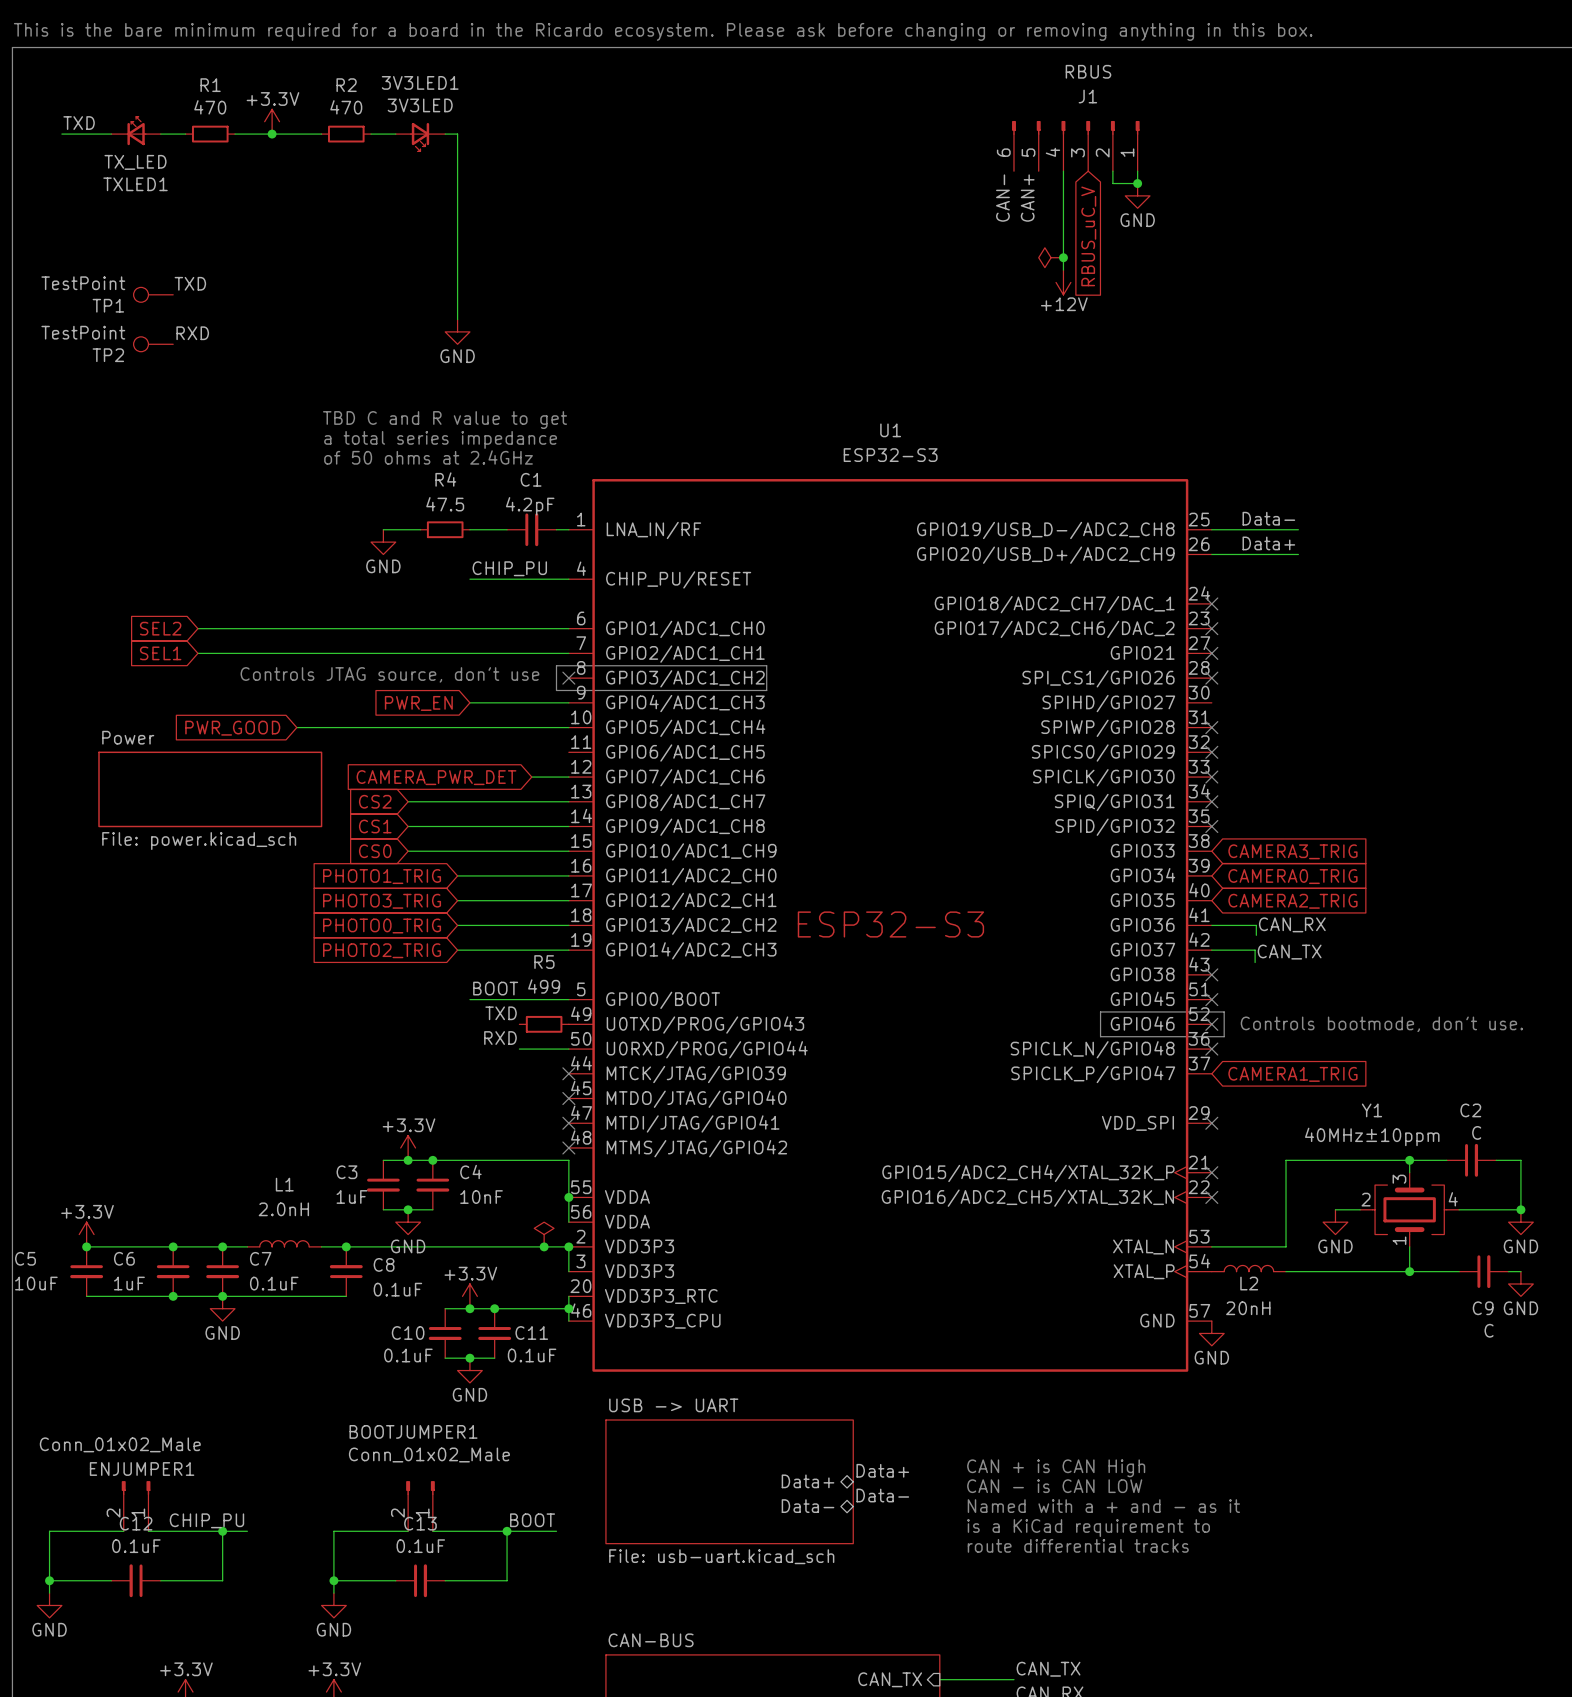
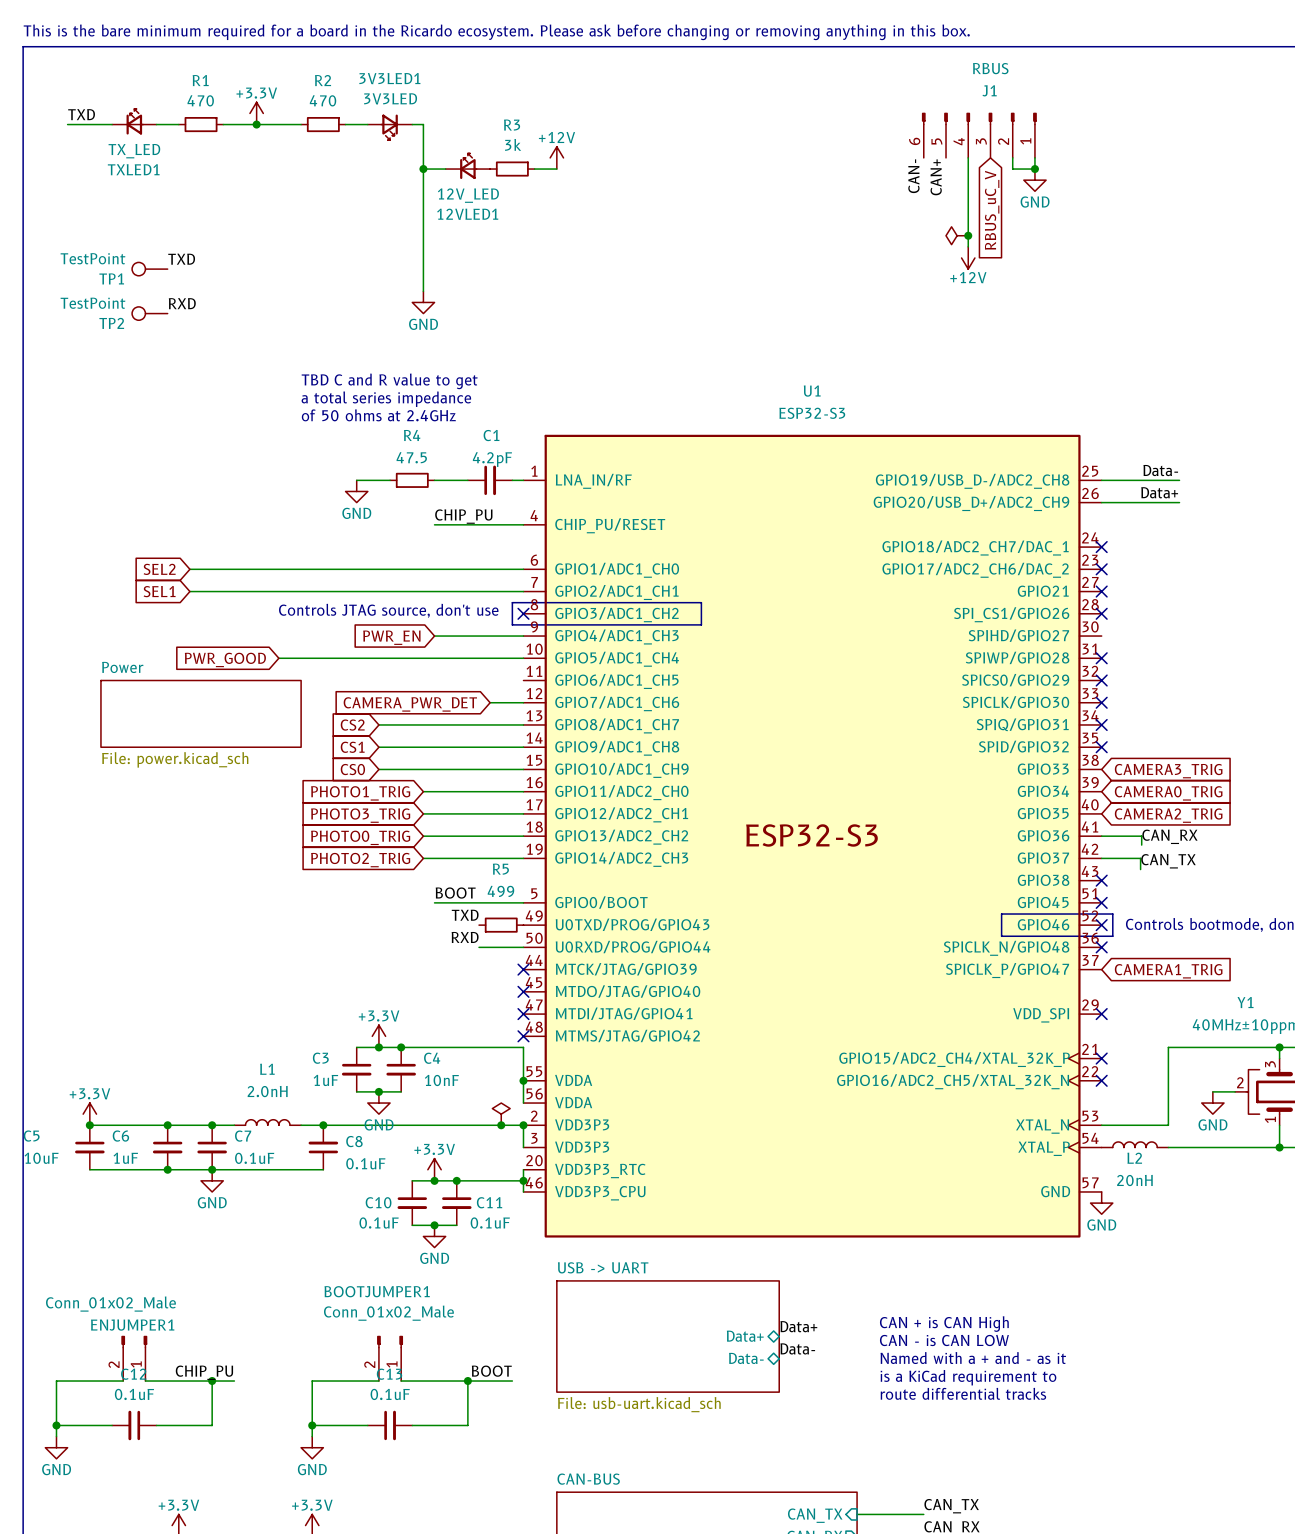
power symbol: none -> +12V (556, 157)
12VLED1: none -> 12V_LED (467, 166)
wire: none -> (423, 169) (445, 169)
junction: none -> (423, 169)
R3: none -> 3k (512, 169)
wire: none -> (534, 169) (556, 169)

